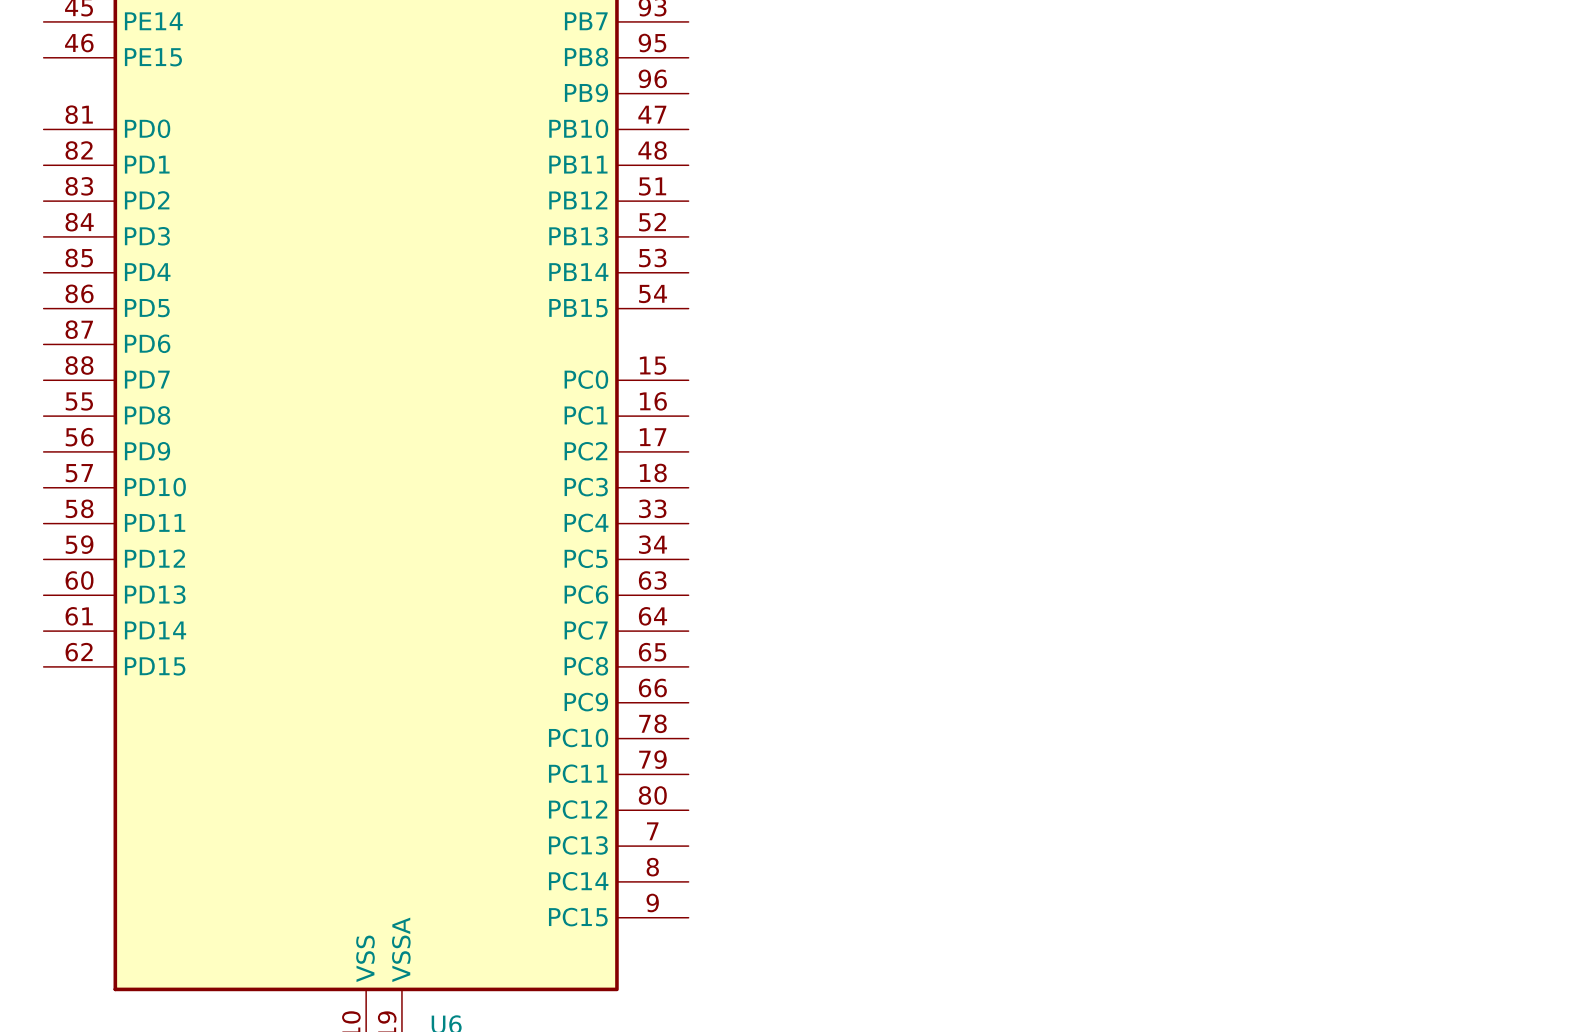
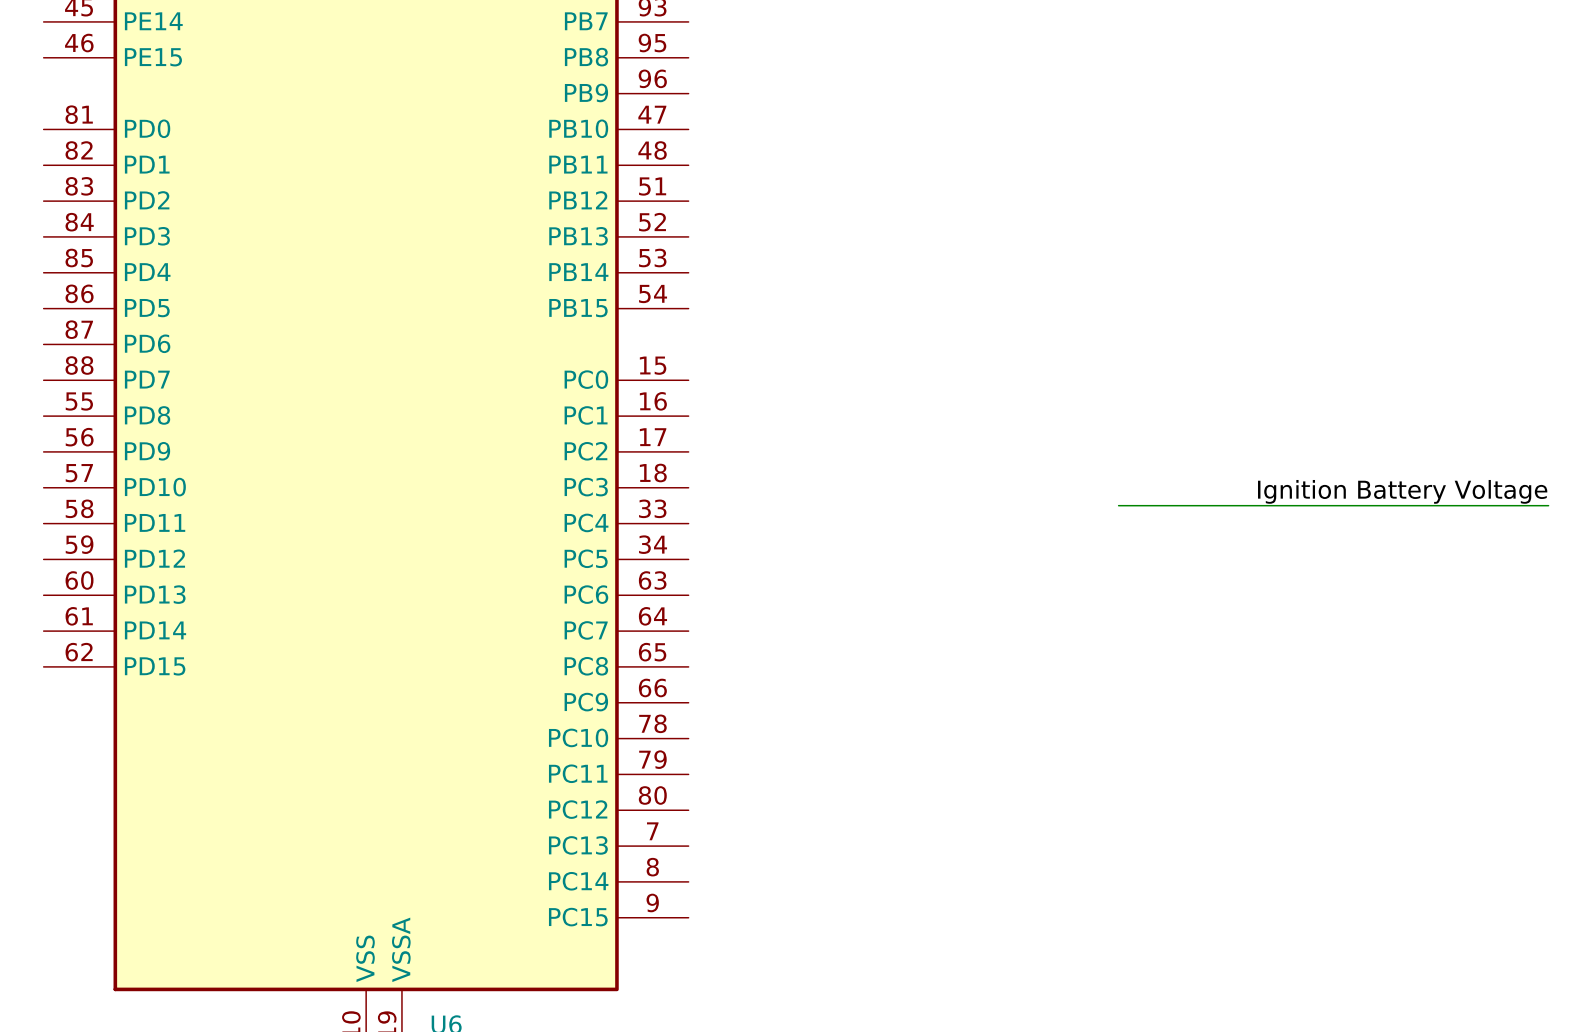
label: none -> Ignition Battery Voltage (1402, 491)
wire: none -> (1118, 505) (1548, 505)

